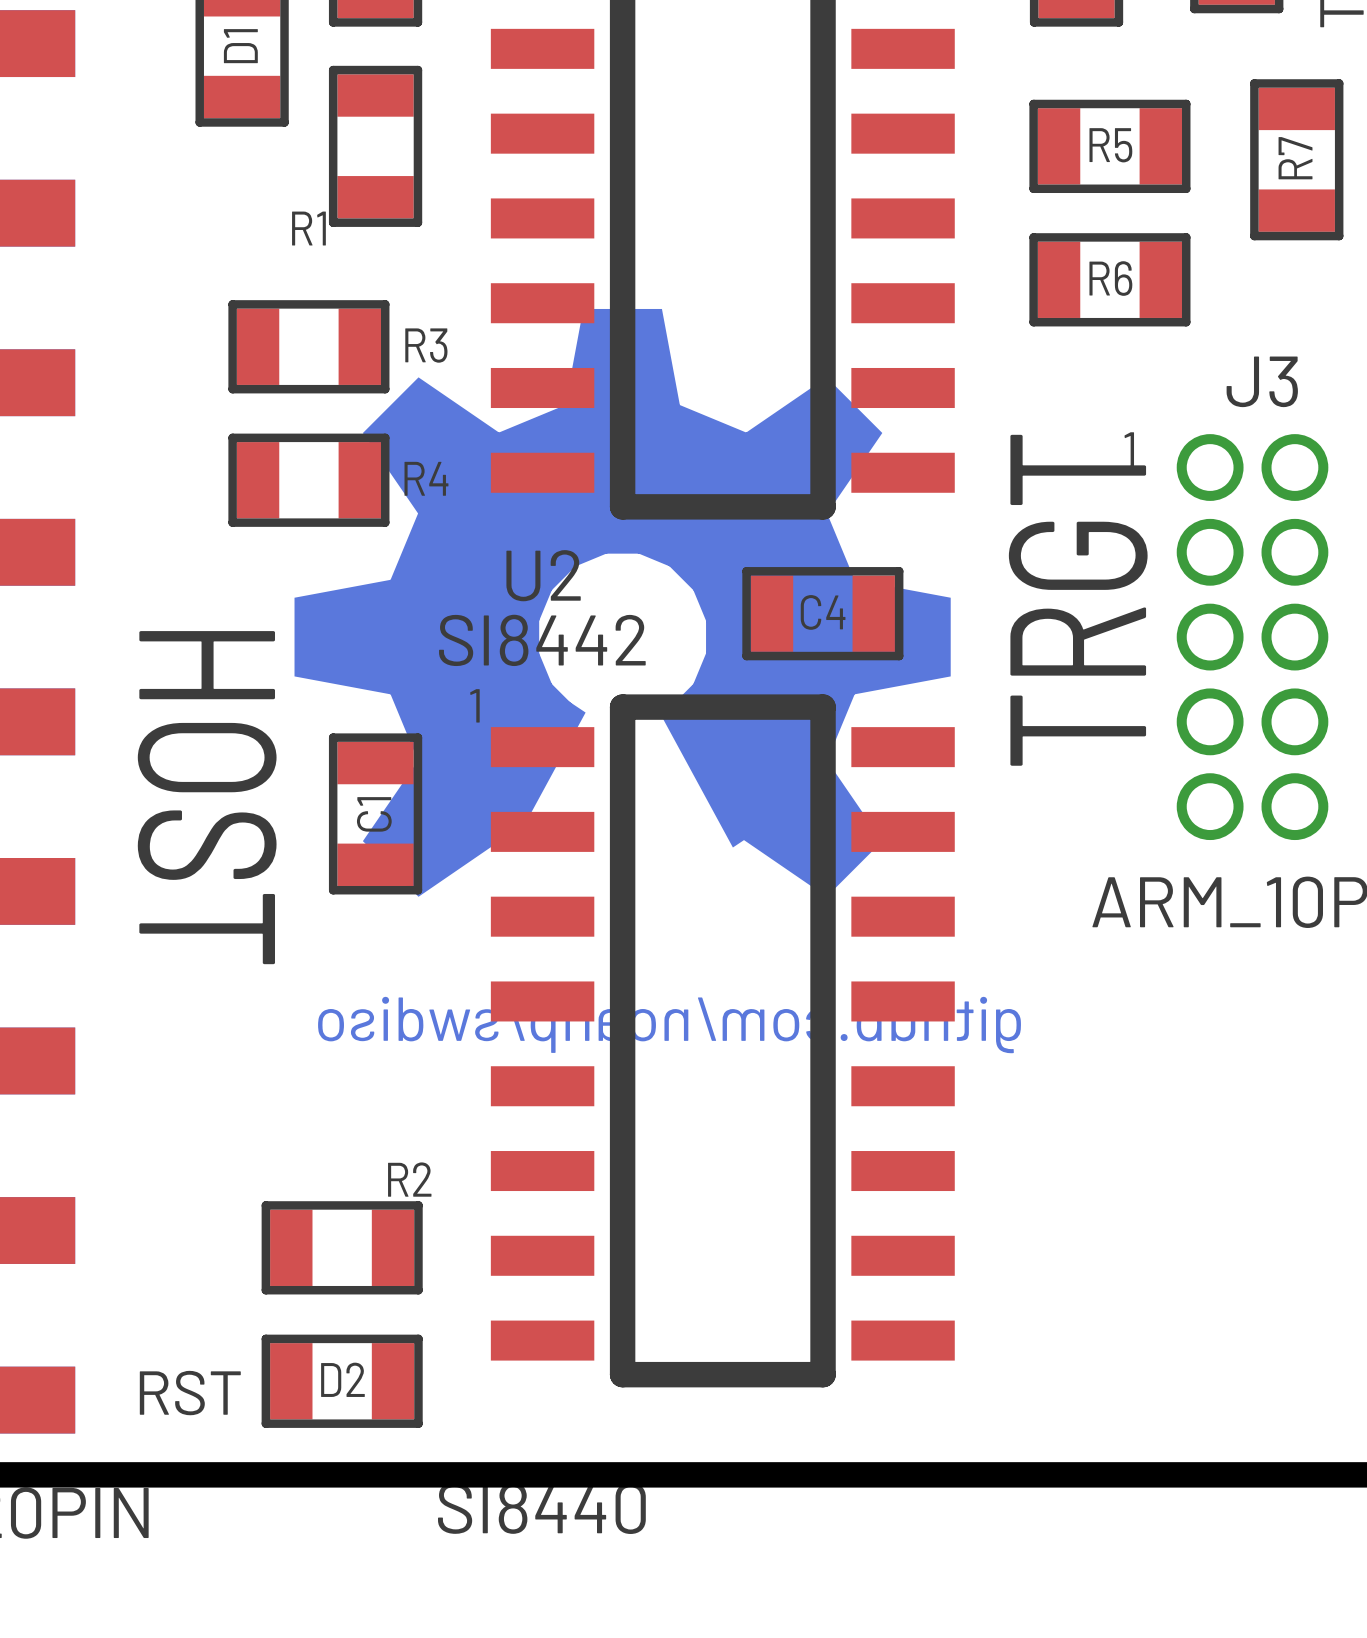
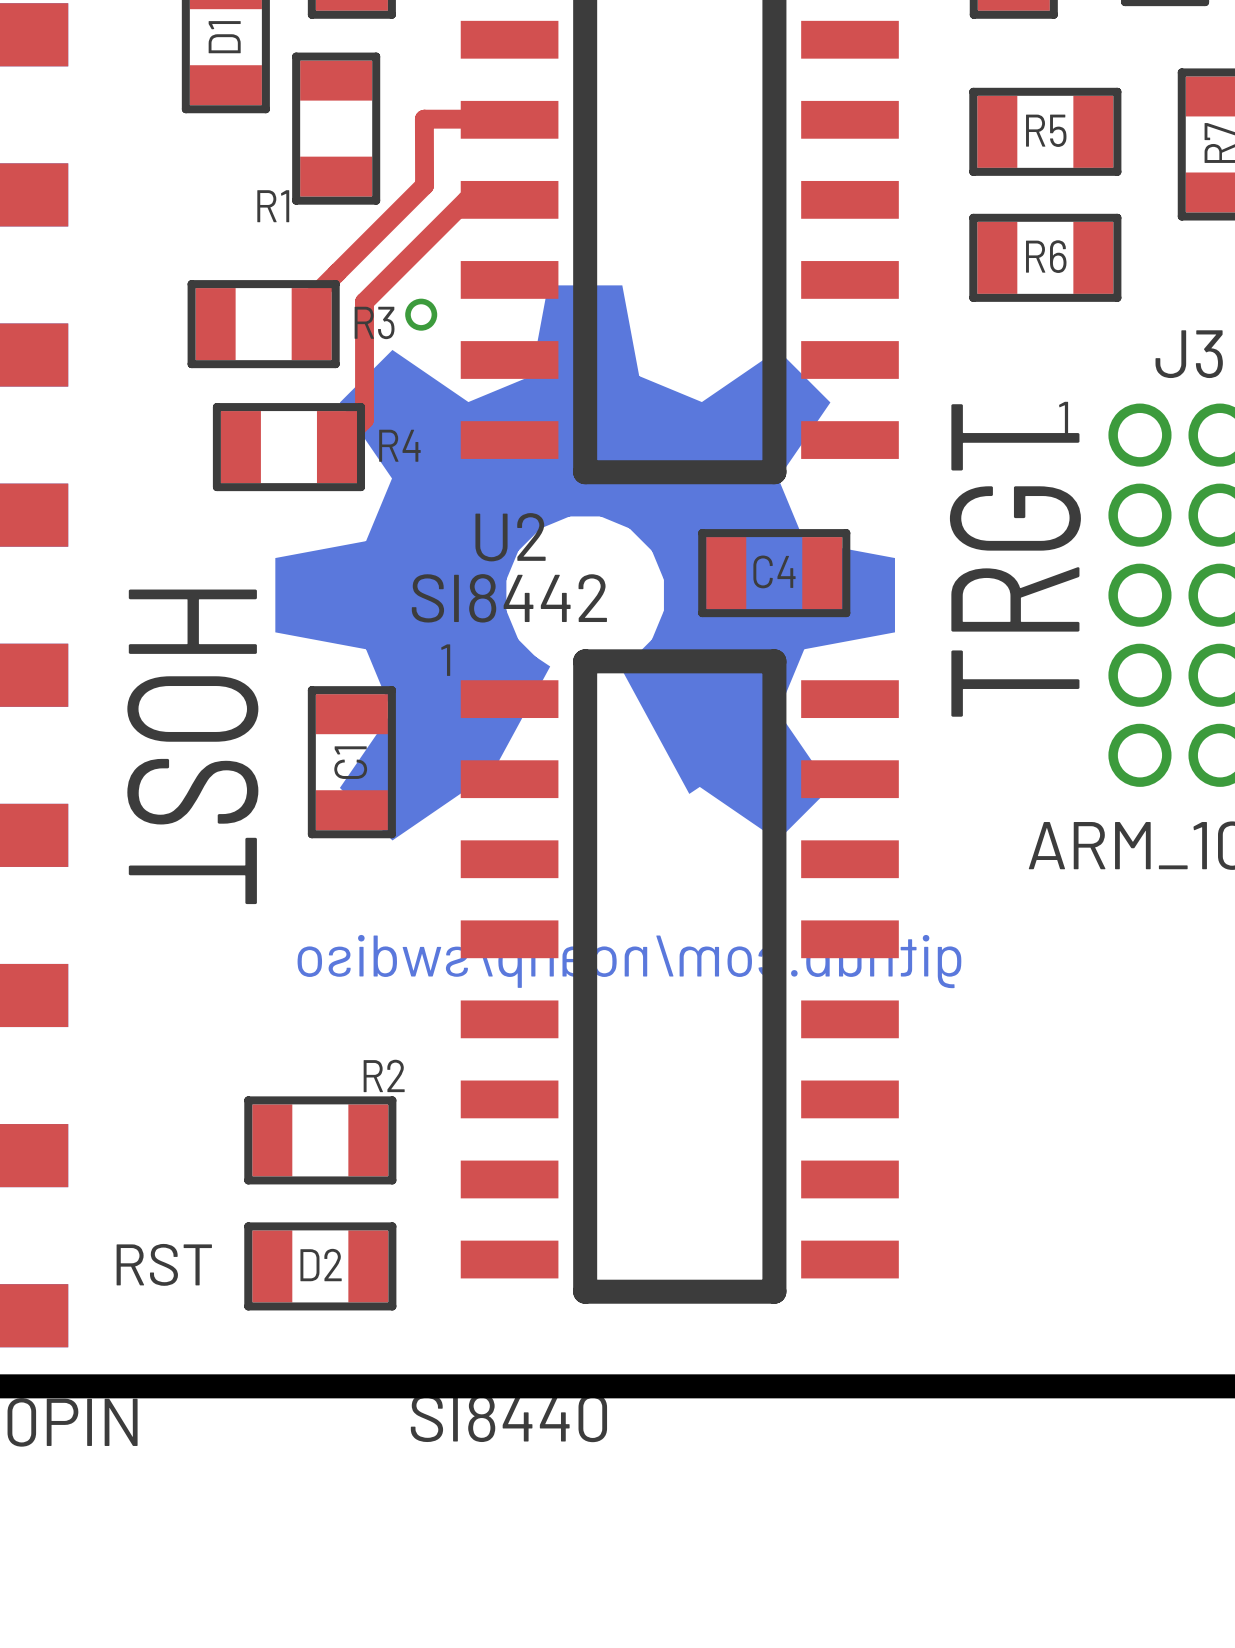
top track: none -> (508, 119) (424, 119) (424, 185) (311, 298) (311, 324)
R1 position: (375, 146) -> (336, 128)
top track: none -> (509, 199) (466, 199) (364, 302) (364, 419) (336, 447)
via: none -> (421, 314)
R3 position: (308, 346) -> (263, 324)
R2 position: (342, 1247) -> (320, 1140)
D2 position: (342, 1381) -> (320, 1266)
text position: RST (190, 1393) -> RST (164, 1264)

